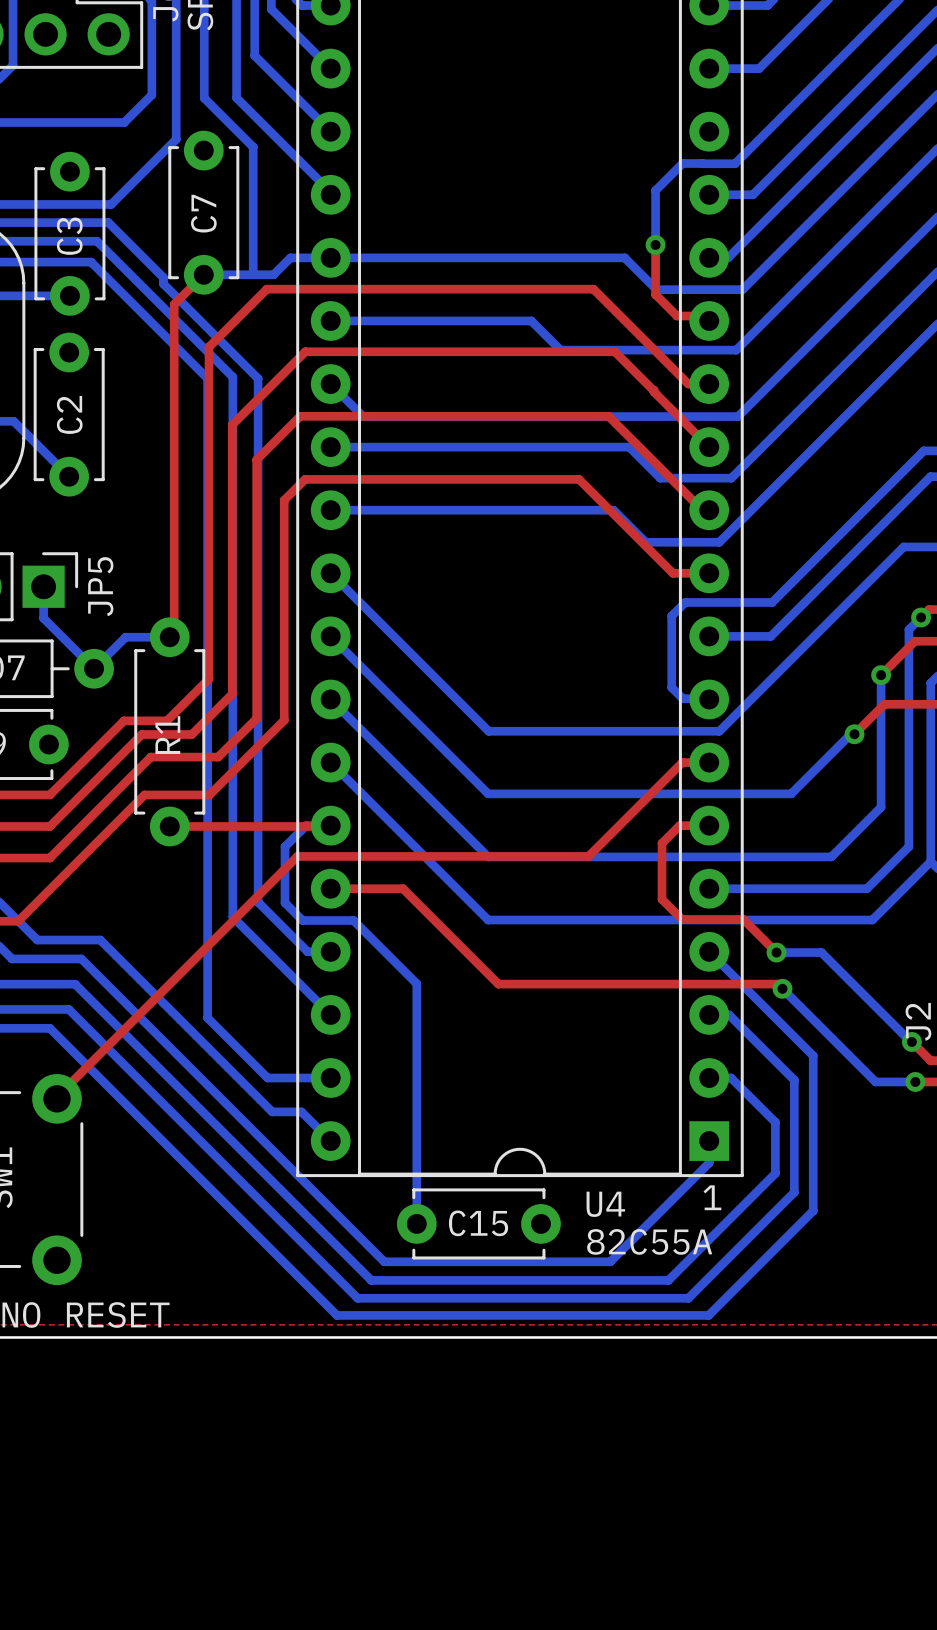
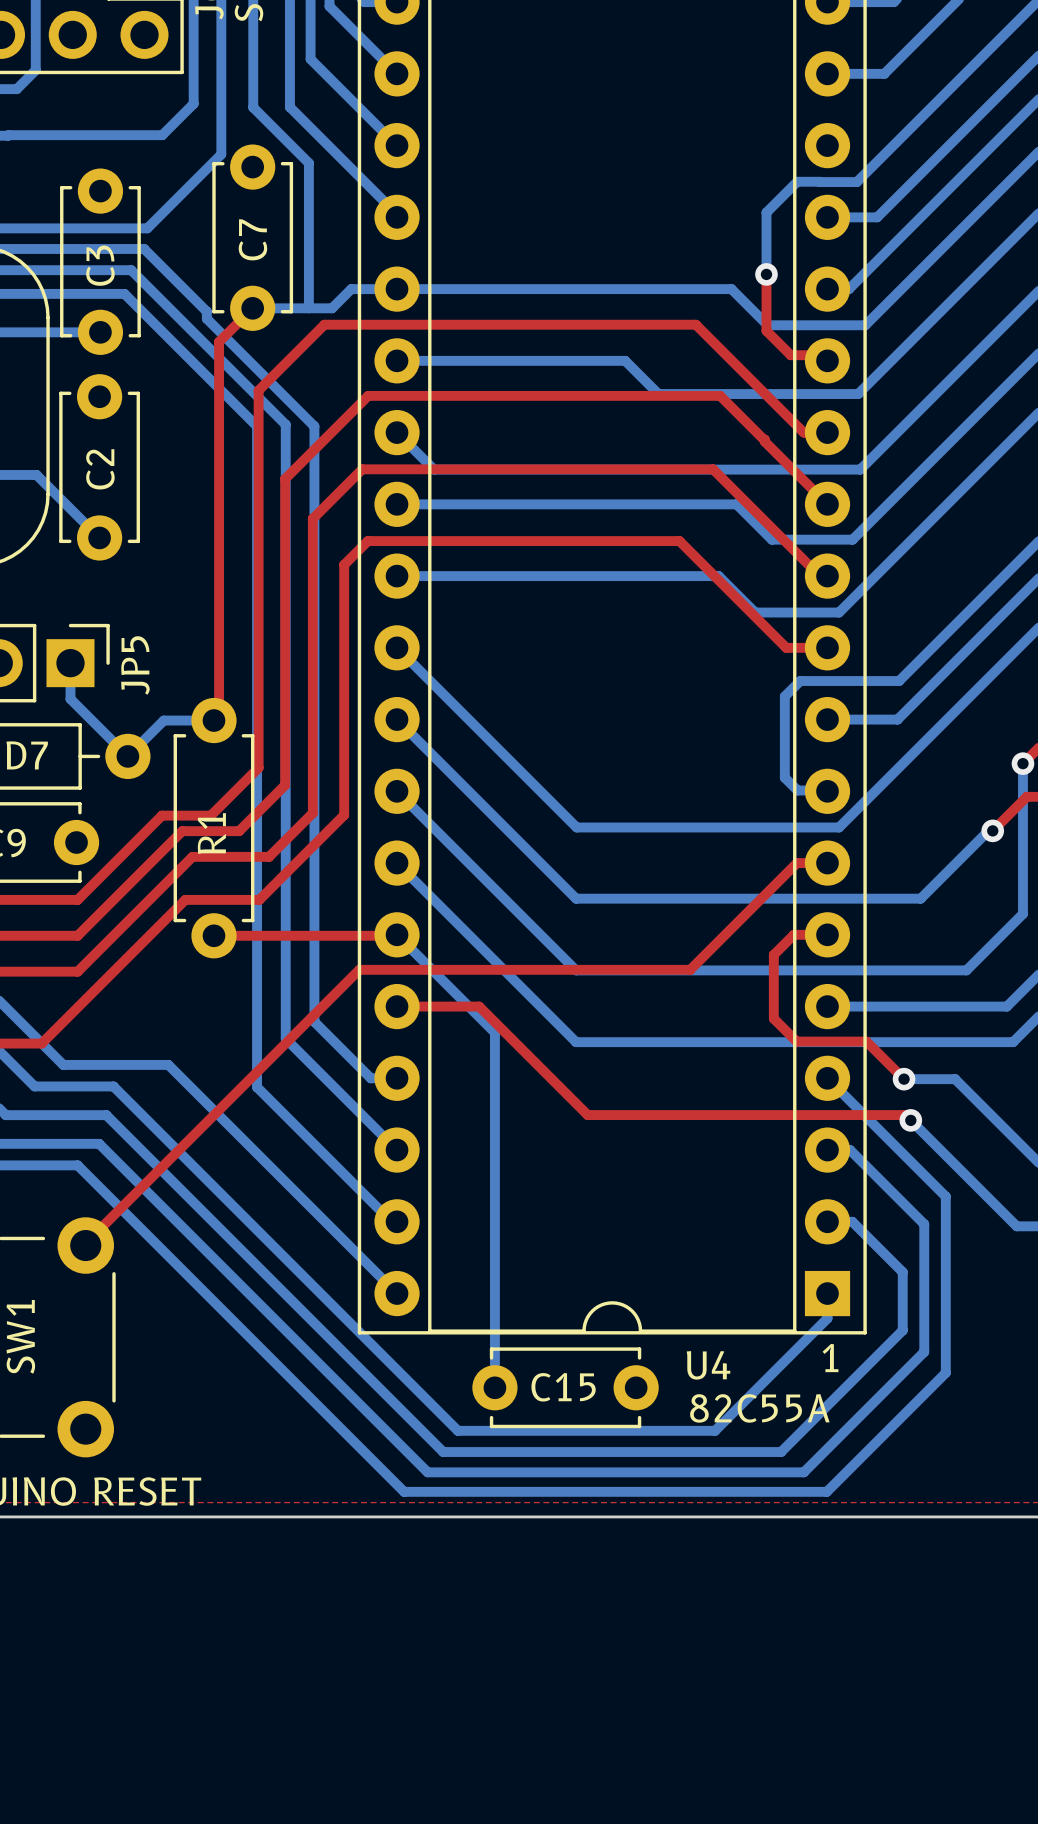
bottom track: (330, 825) (306, 825) (285, 846) (285, 902) (302, 920) (353, 920) (416, 983) -> (397, 934) (494, 1032) (494, 1114)
bottom track: (100, 940) (272, 1111) (301, 1111) -> none
bottom track: (207, 959) (207, 1017) -> (135, 1064) (168, 1064) (257, 1153)
bottom track: none -> (257, 1087) (391, 1221)
bottom track: (267, 1077) (325, 1077) -> (325, 1221) (363, 1260)

